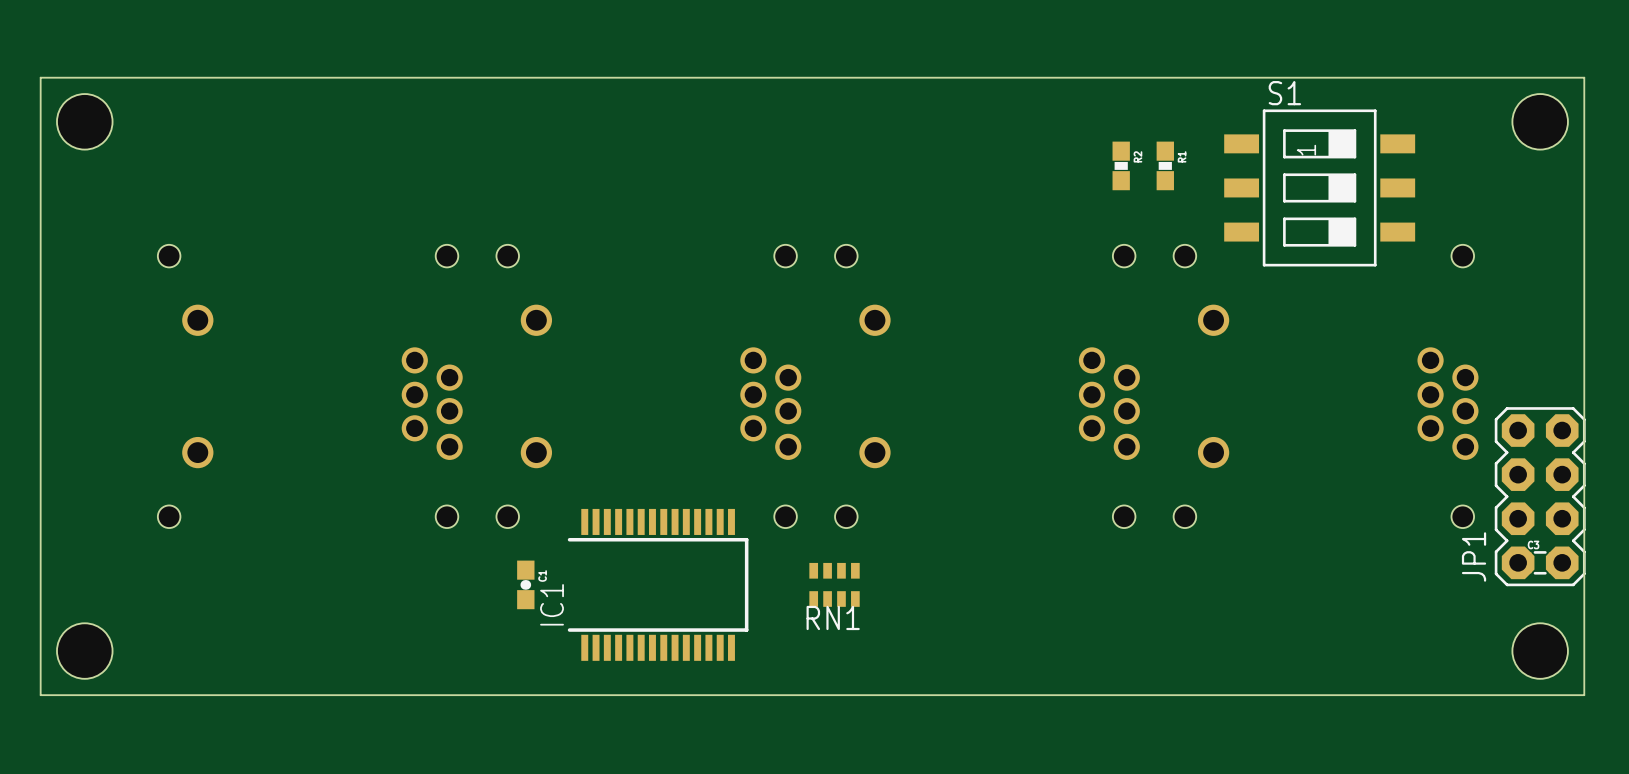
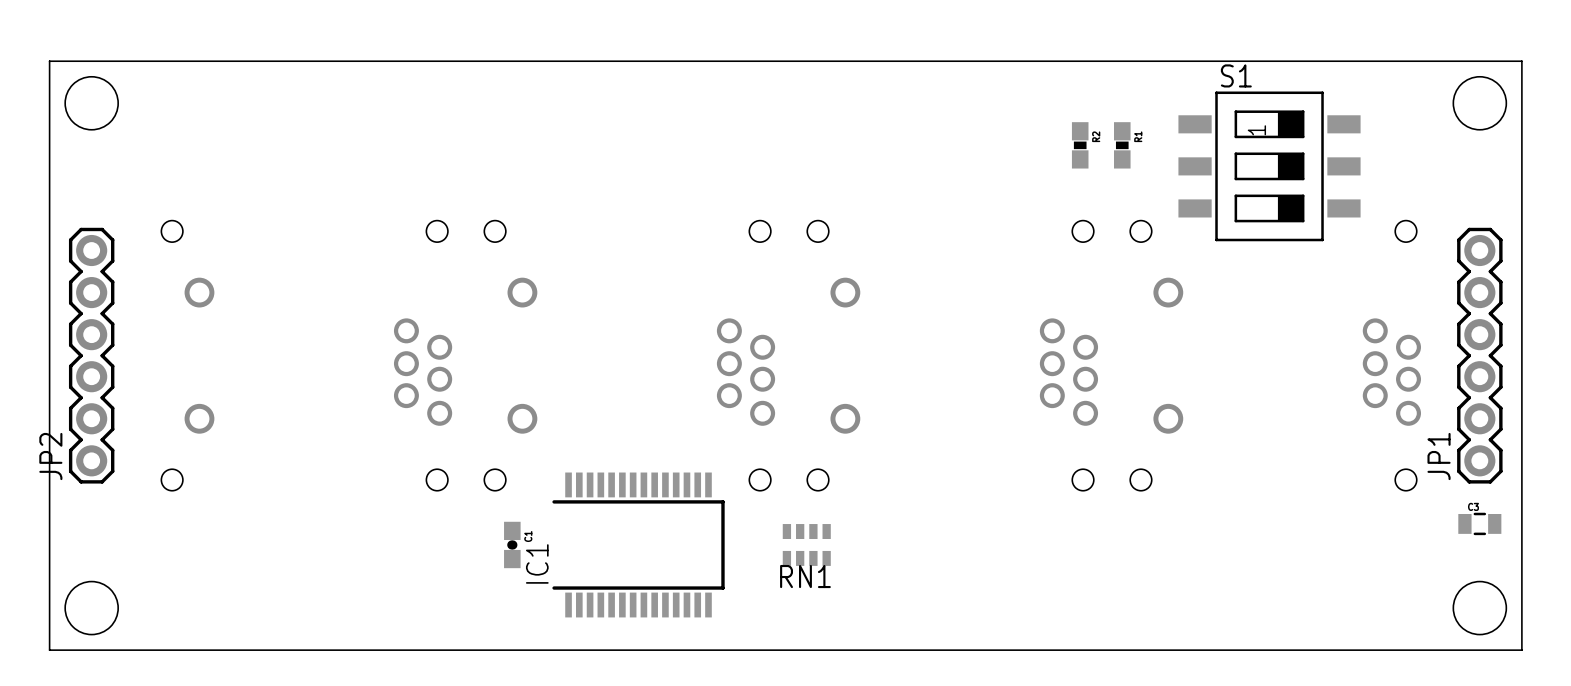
JP2: none -> (91, 355)
JP1 footprint: [1494, 407, 1586, 587] -> [1457, 227, 1503, 484]
JP1 name position: JP1 (1474, 556) -> JP1 (1439, 456)

